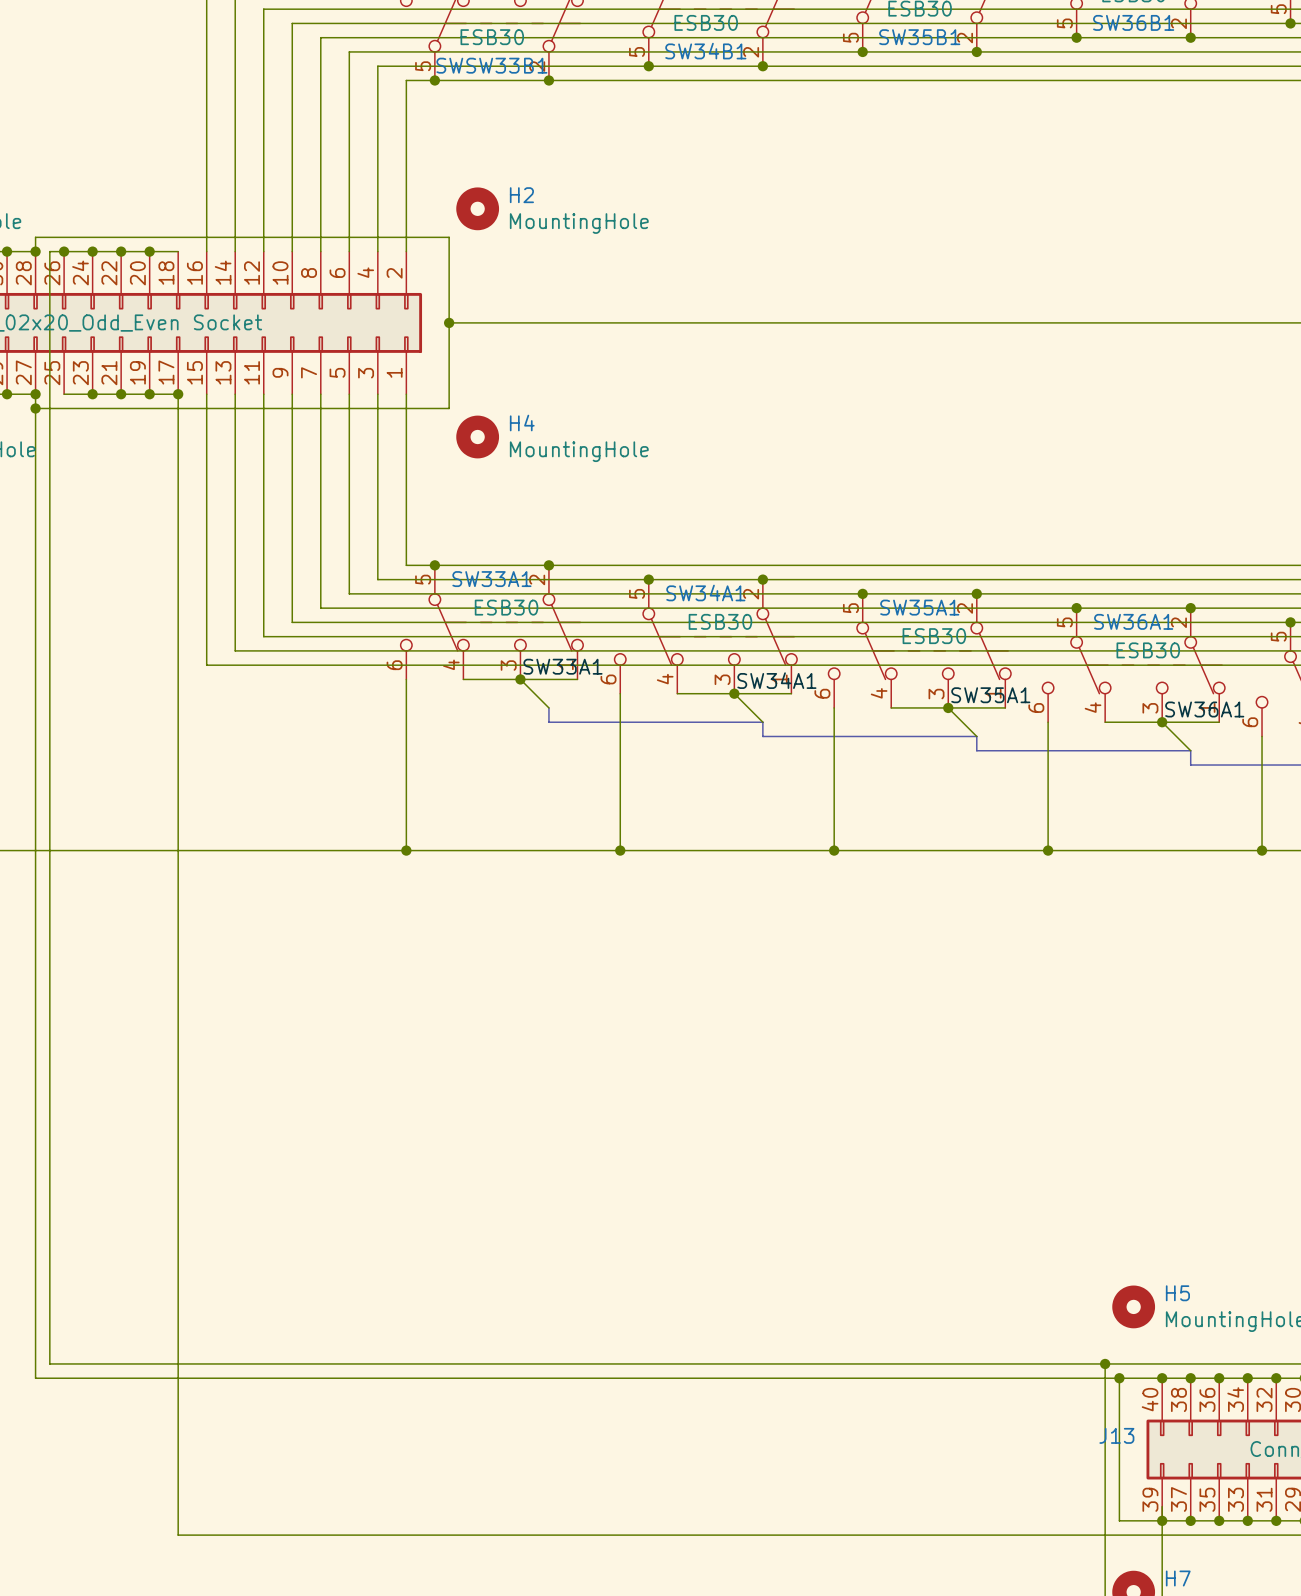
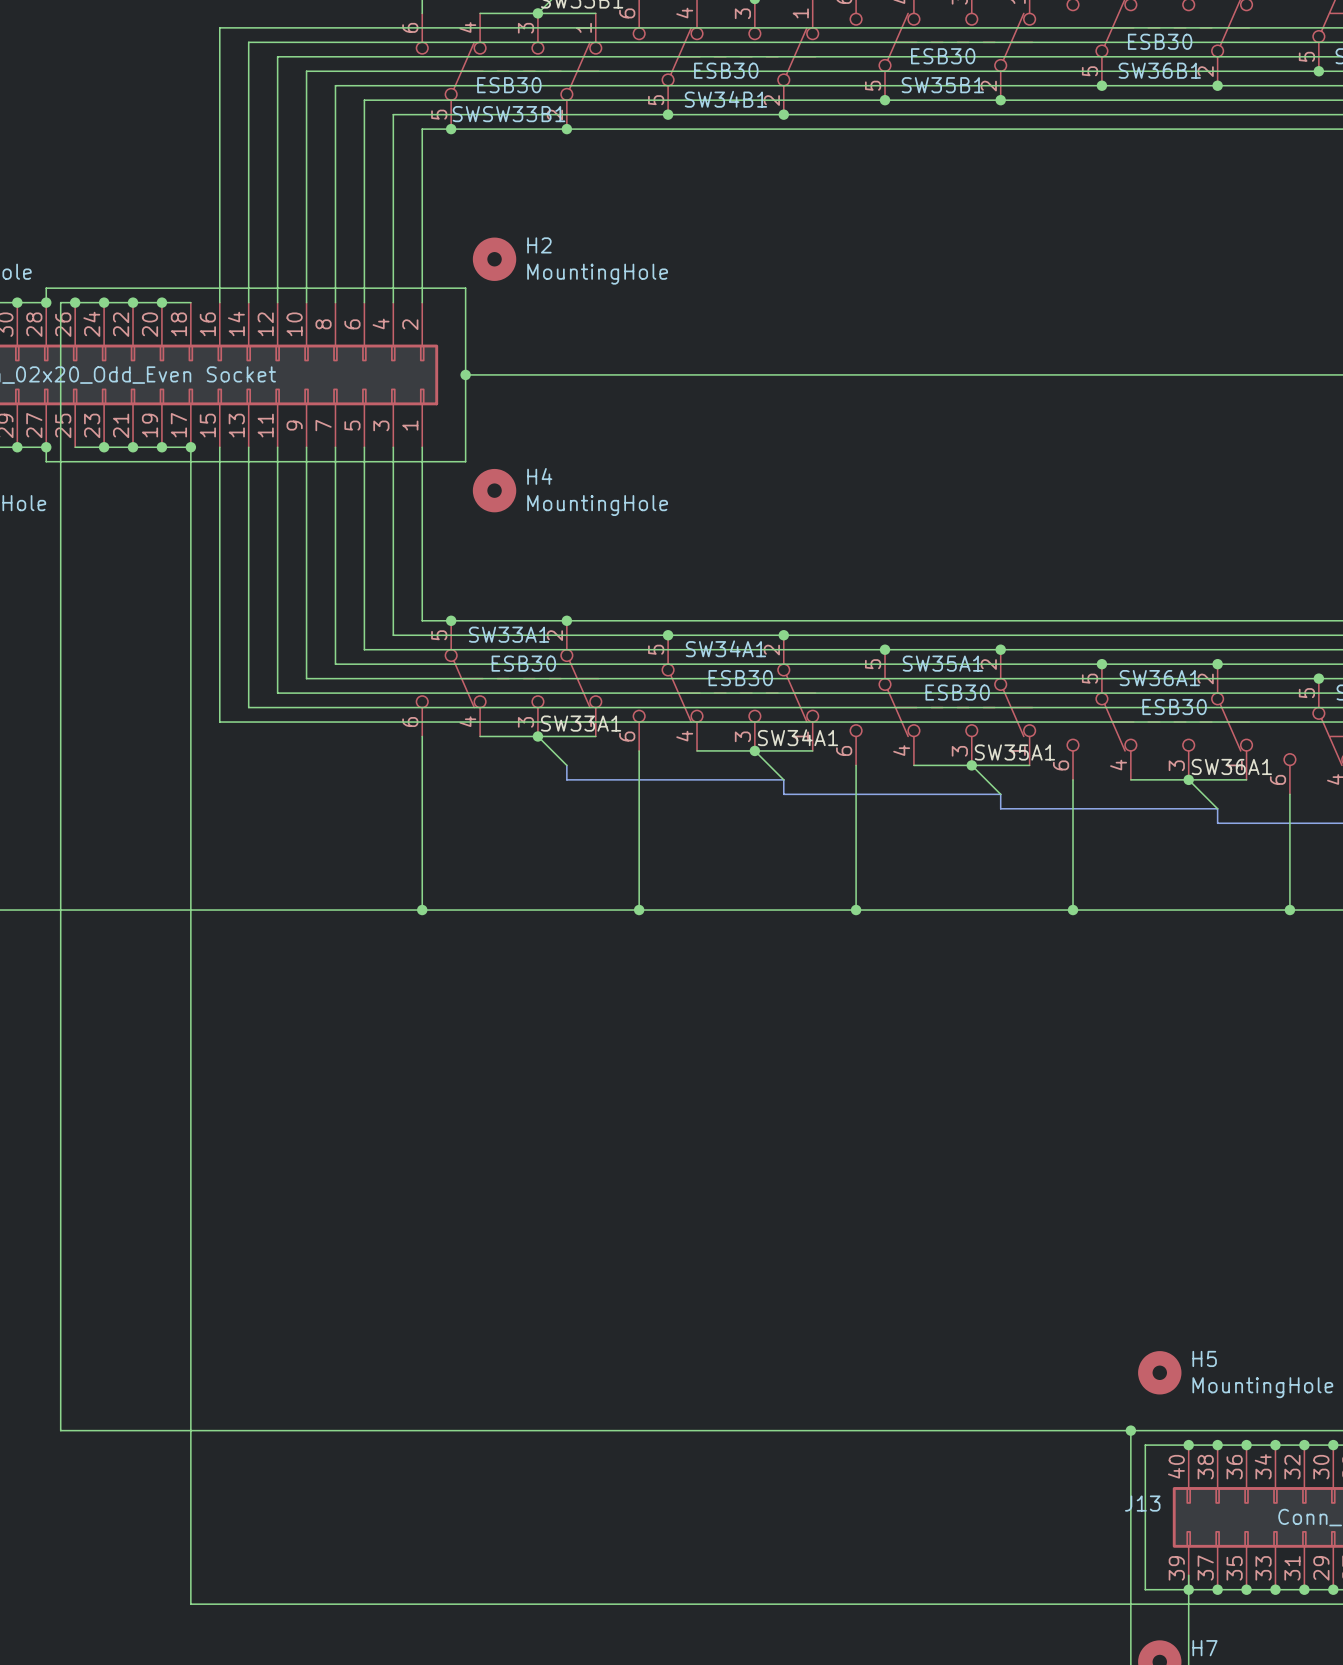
wire: (35, 408) (35, 1378) (1119, 1378) -> none
junction: (35, 408) -> none
junction: (1119, 1378) -> none

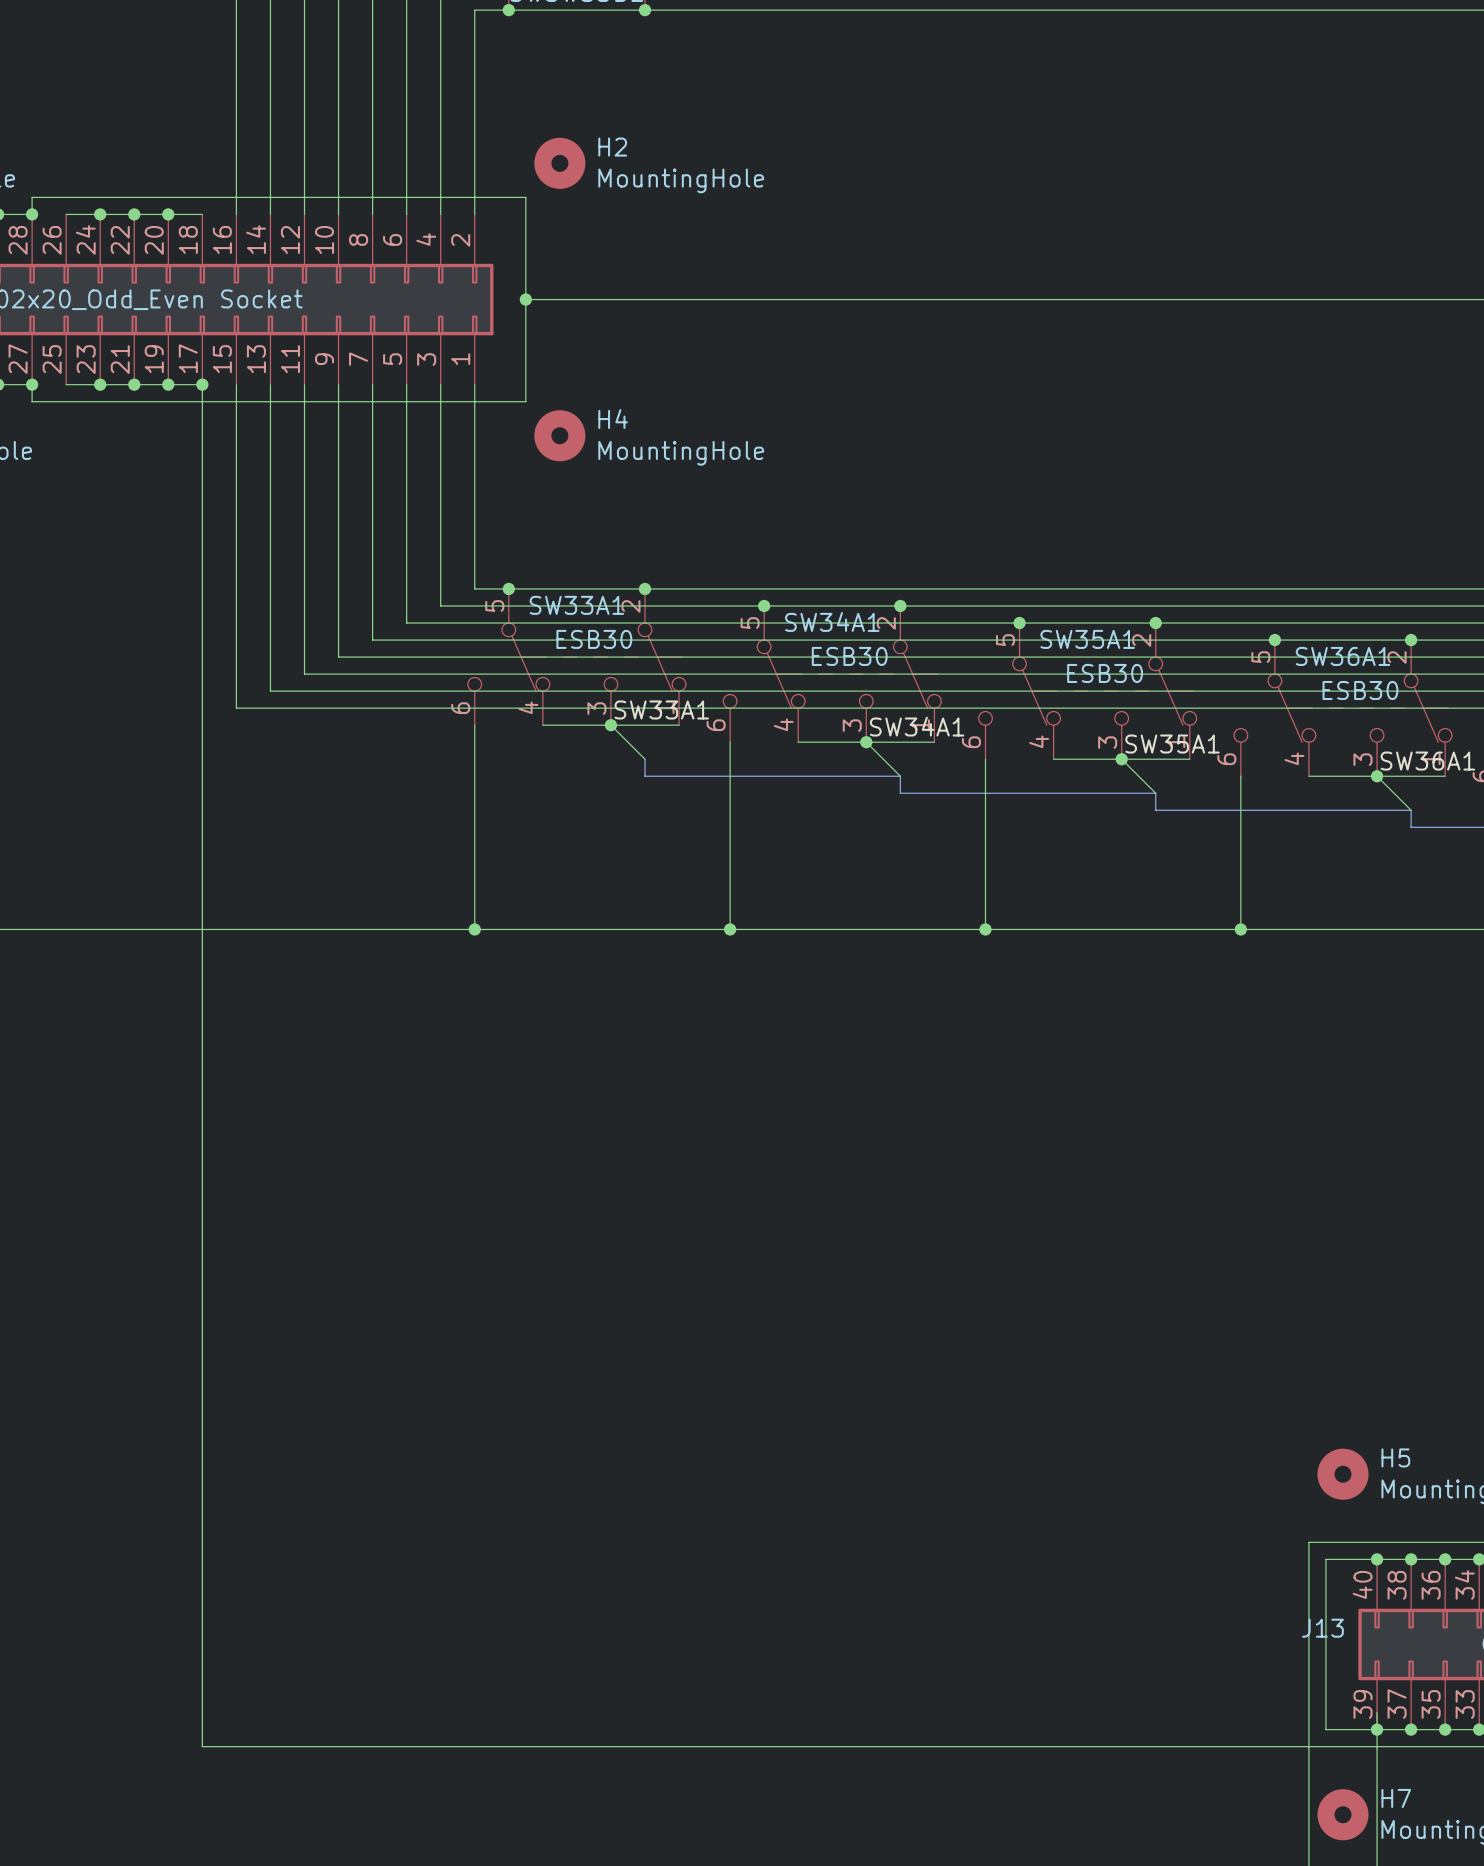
wire: (75, 302) (60, 302) (60, 1430) (1130, 1430) -> none
junction: (75, 302) -> none
junction: (1130, 1430) -> none

